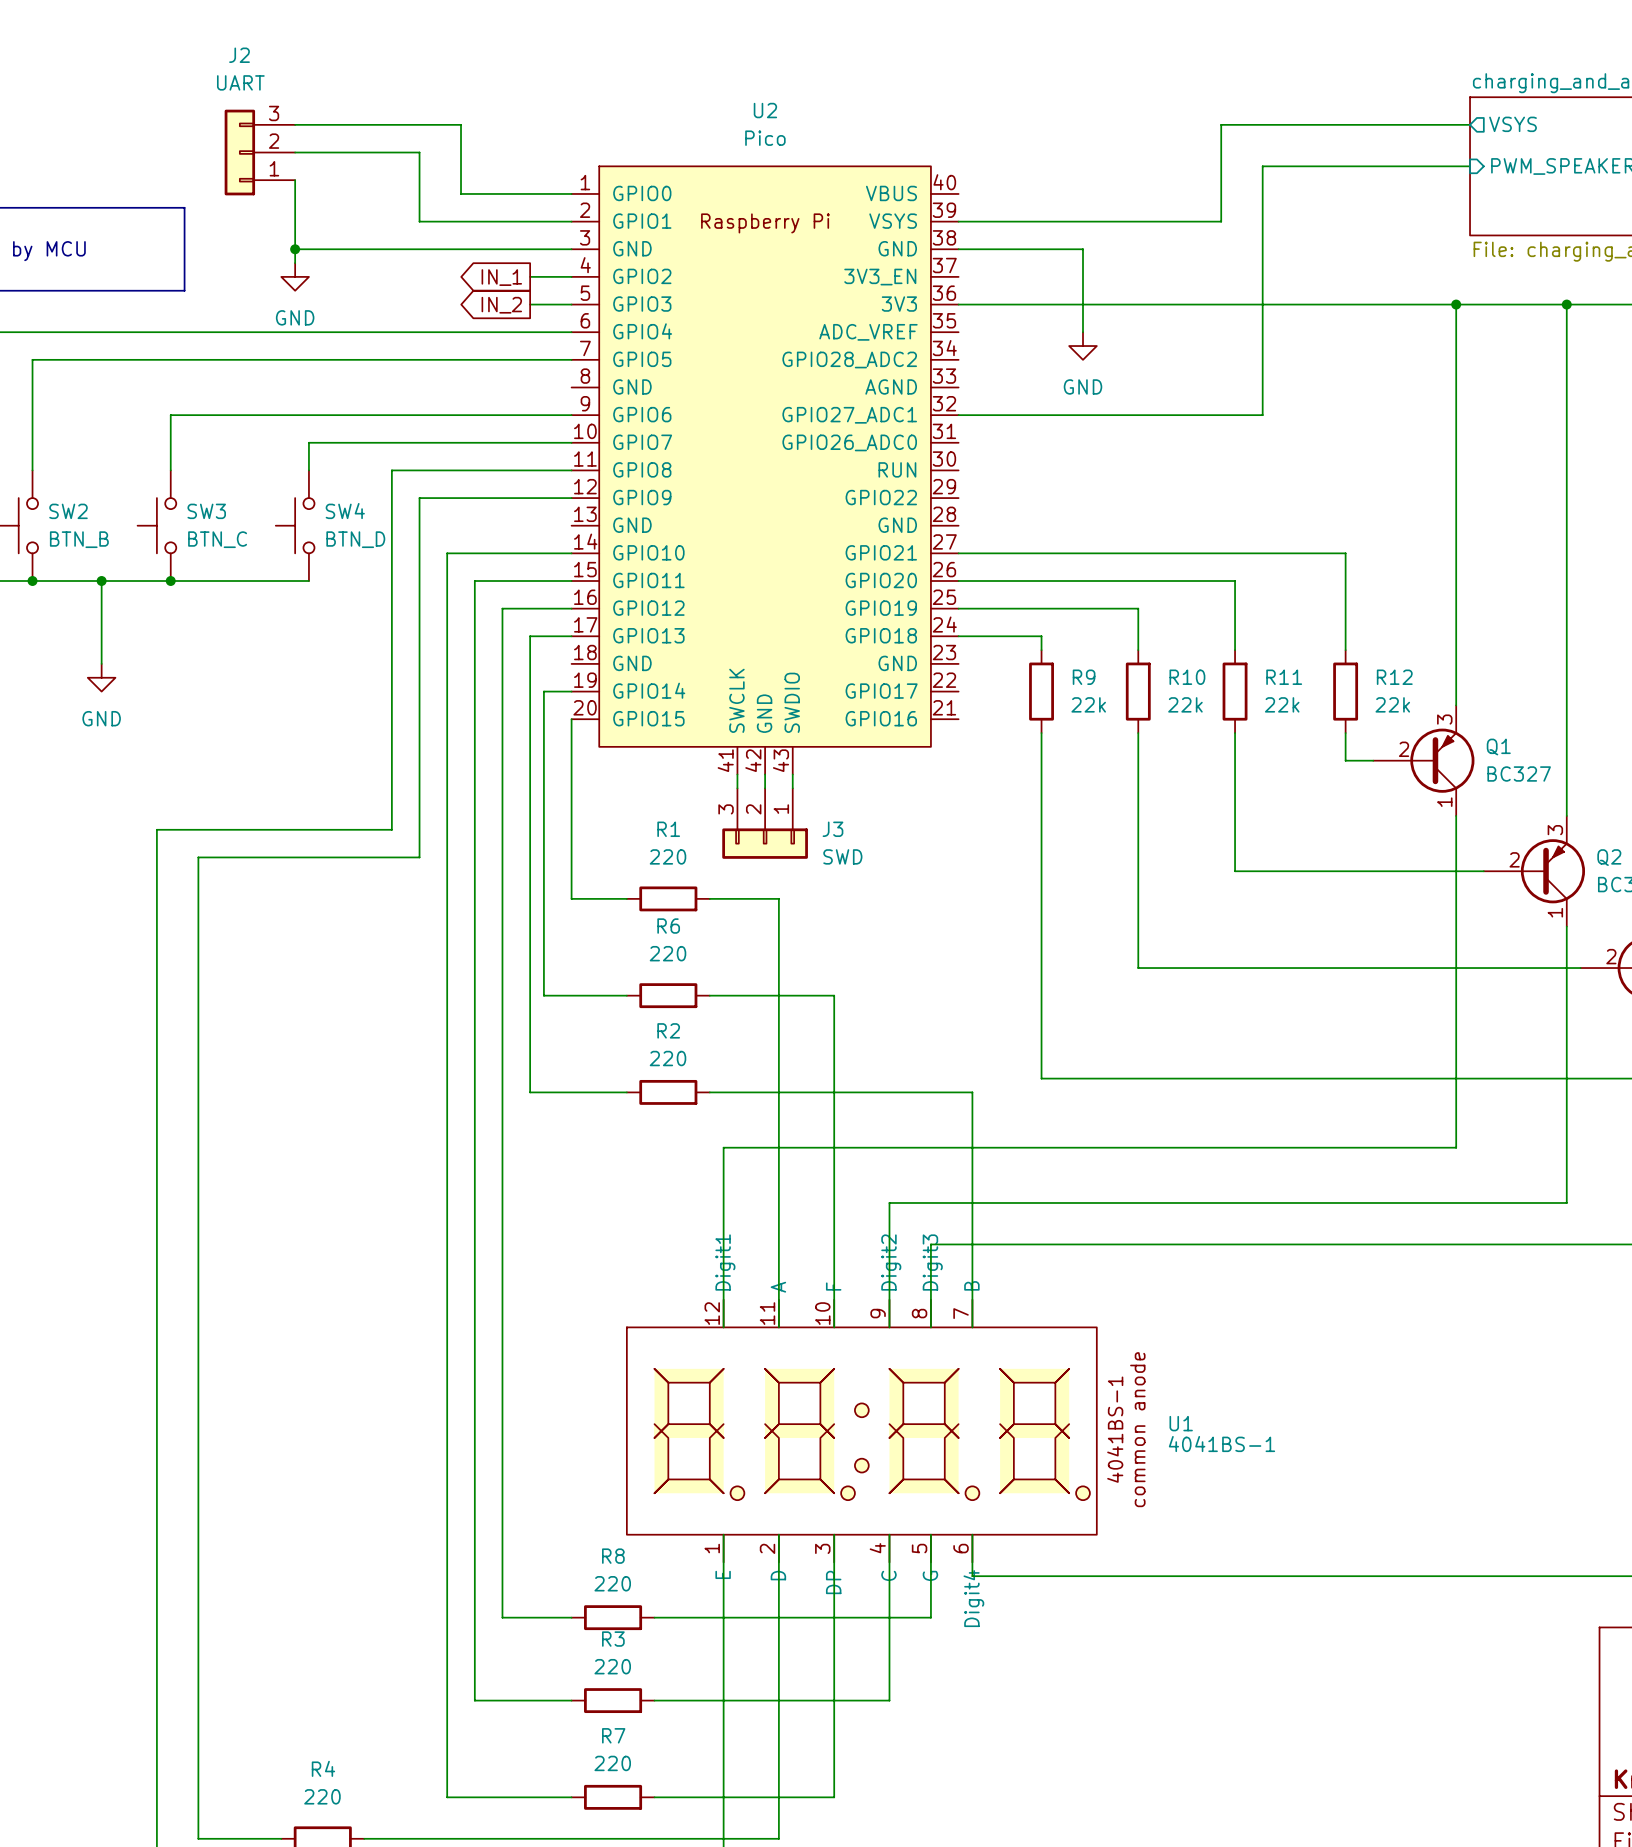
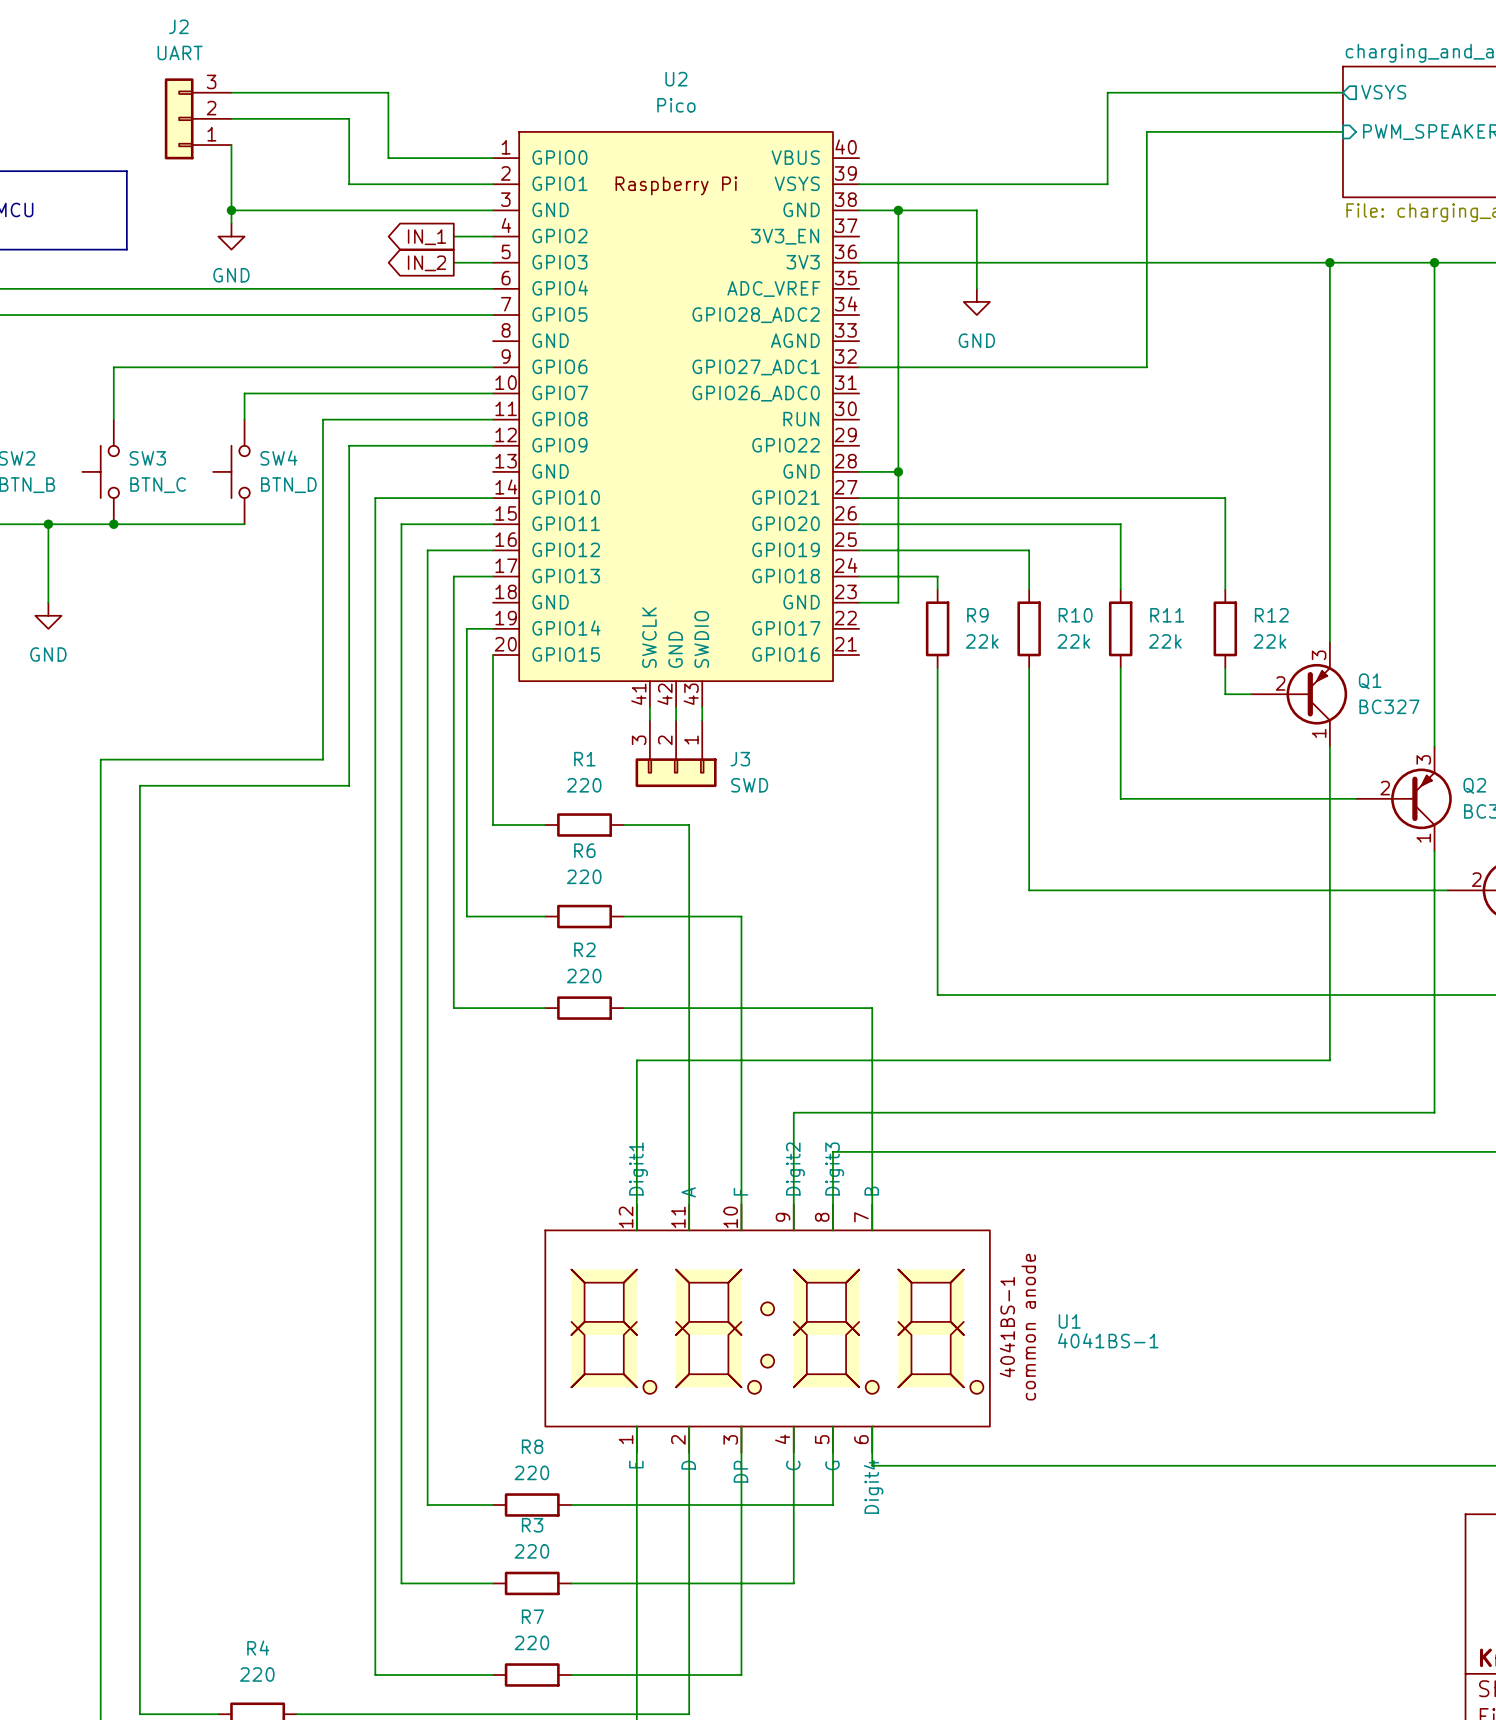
wire: none -> (898, 210) (898, 602) (859, 602)
junction: none -> (898, 210)
wire: none -> (859, 471) (898, 471)
junction: none -> (898, 471)

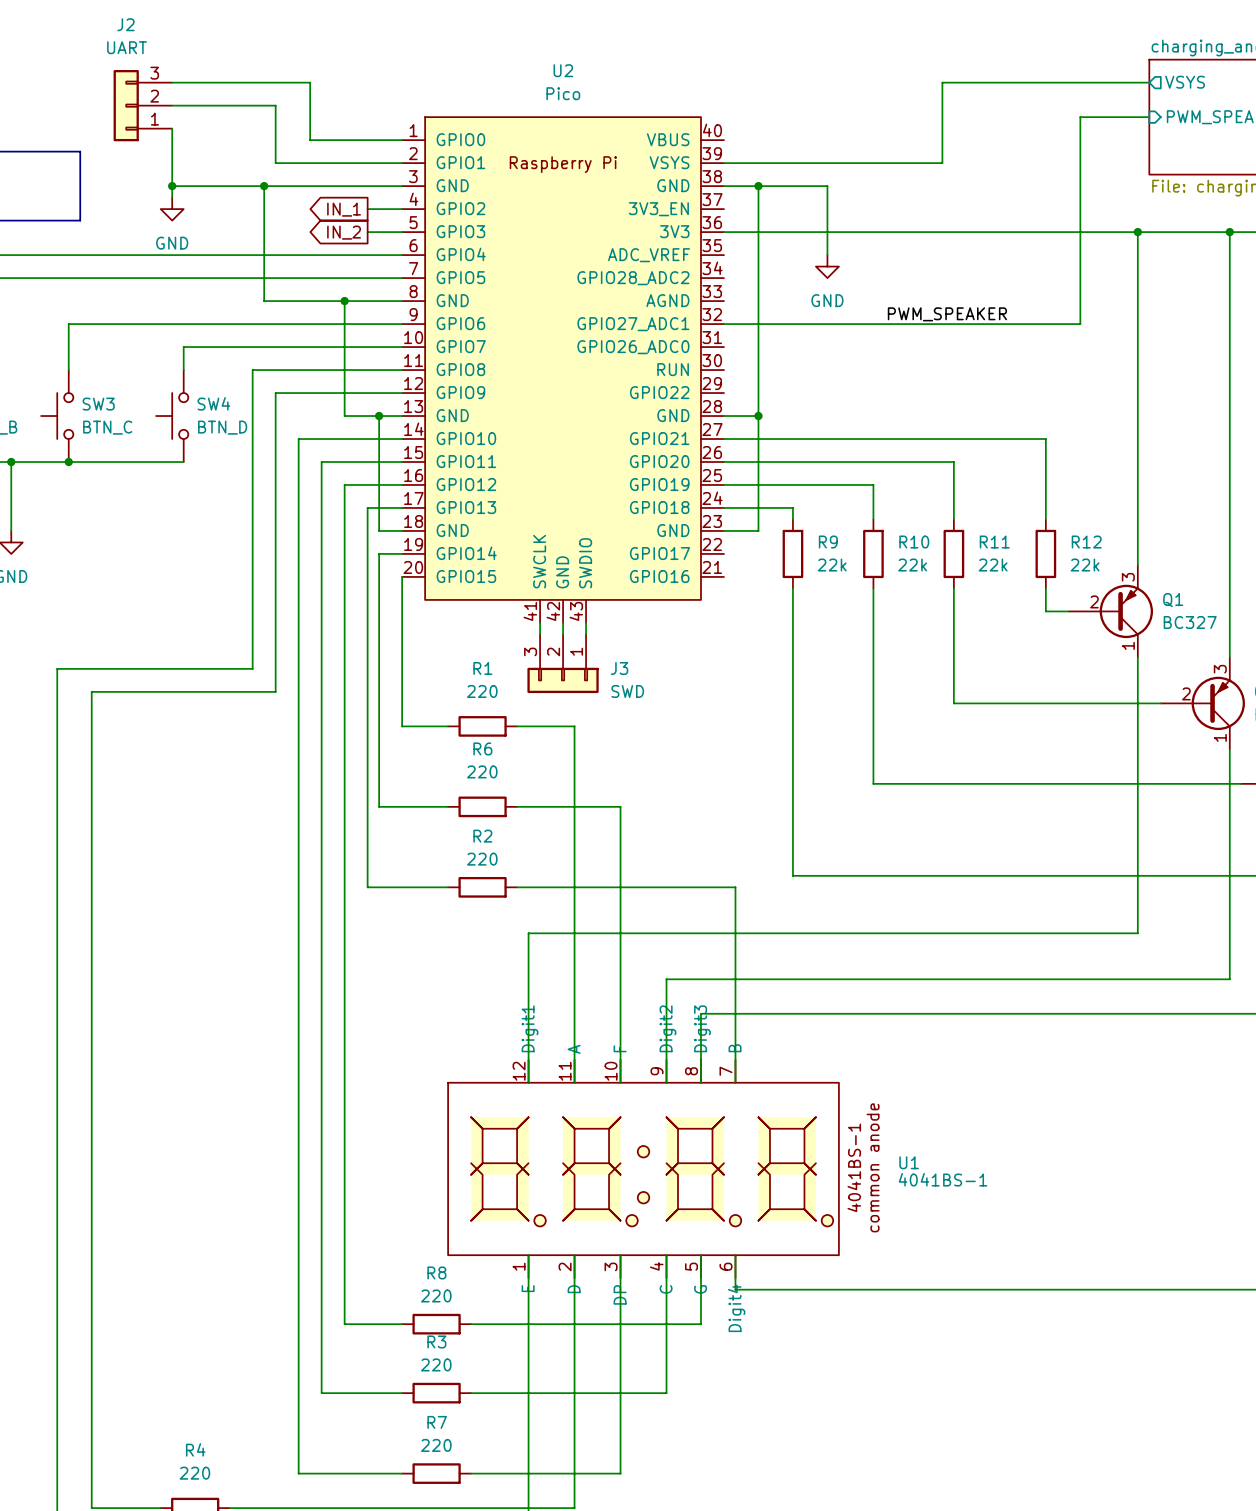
wire: (1264, 131) (1146, 131) (1146, 367) -> (1080, 117) (1080, 324) (976, 324)
wire: none -> (264, 186) (264, 301) (402, 301)
junction: none -> (264, 186)
wire: none -> (344, 301) (344, 416) (402, 416)
junction: none -> (344, 301)
label: none -> PWM_SPEAKER (947, 314)
wire: none -> (379, 416) (379, 530) (402, 530)
junction: none -> (379, 416)

